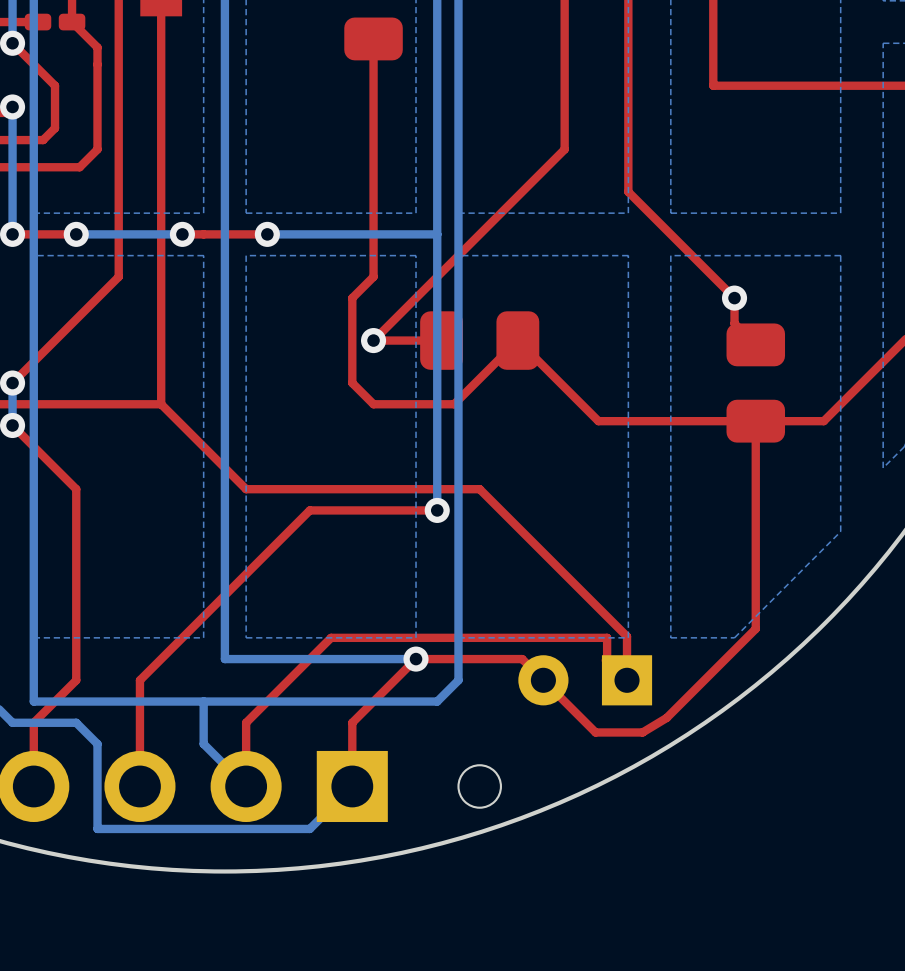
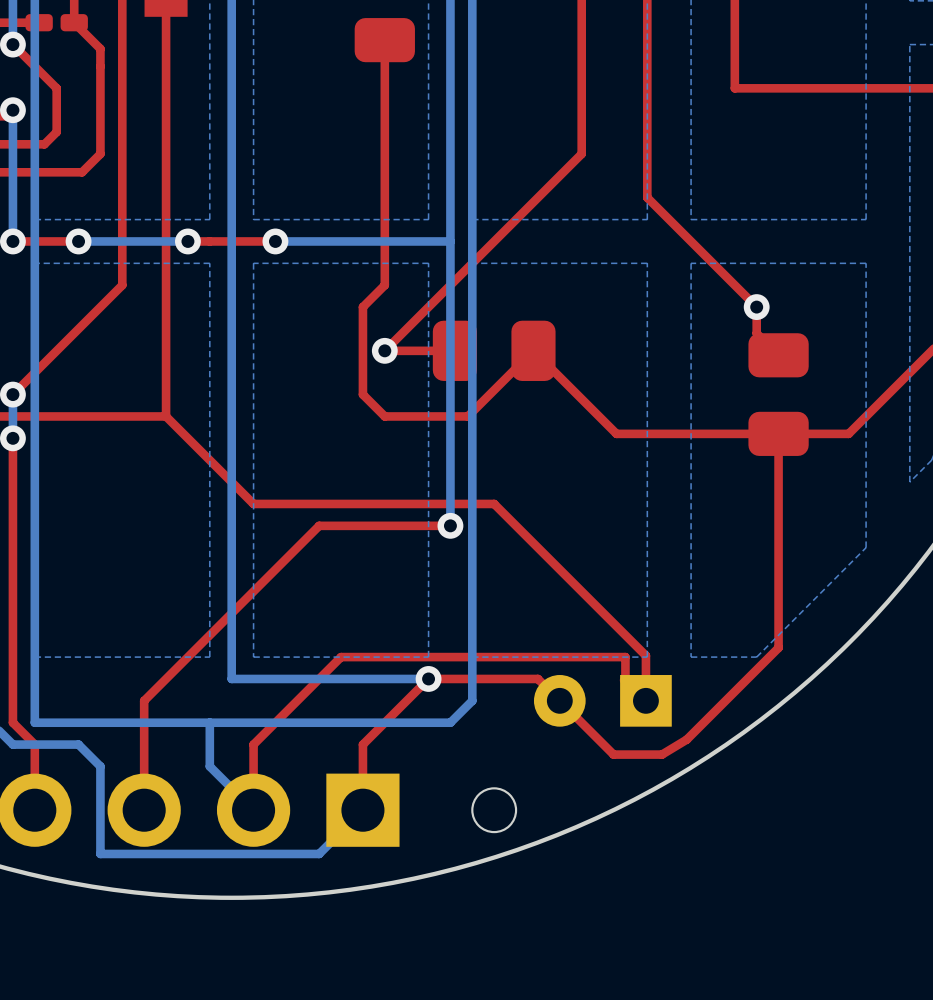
top track: (12, 425) (76, 489) (76, 680) (33, 722) -> (12, 438) (12, 722) (34, 744)

